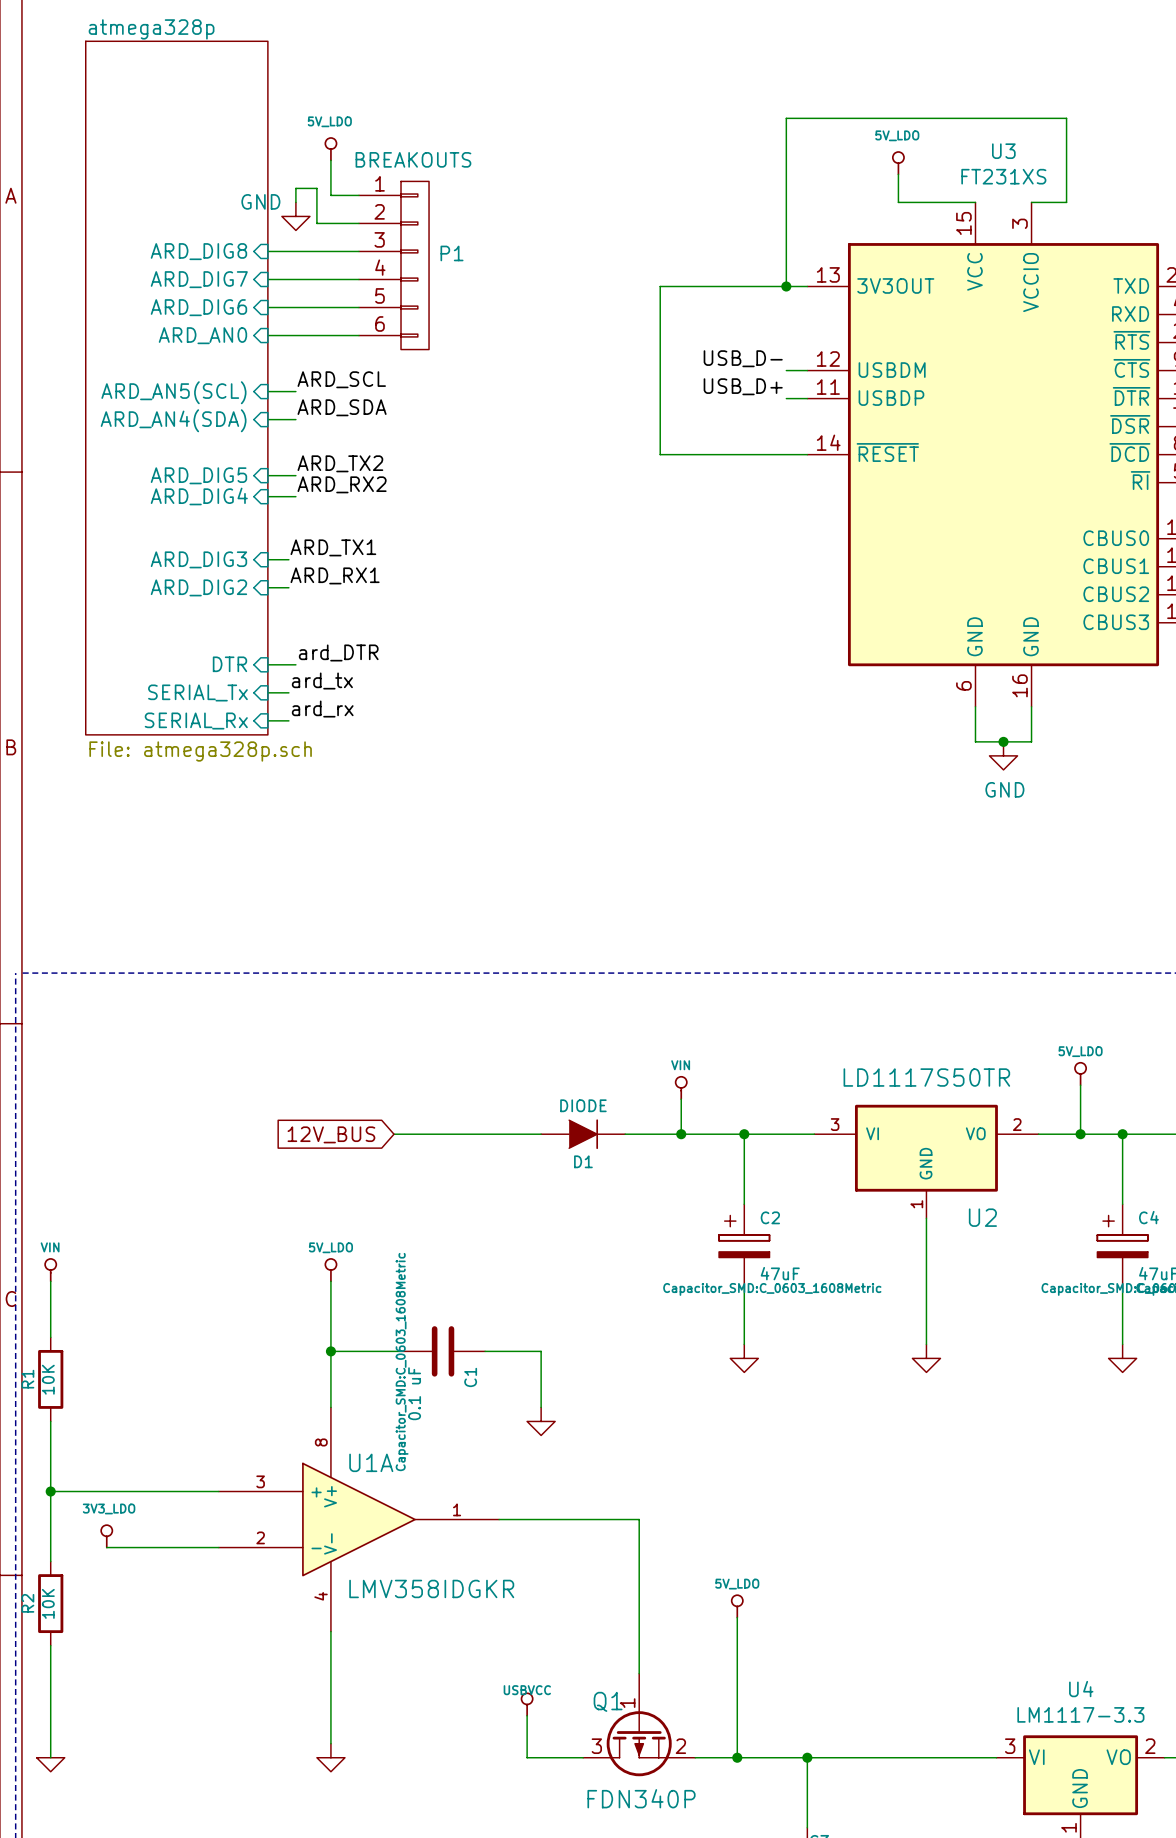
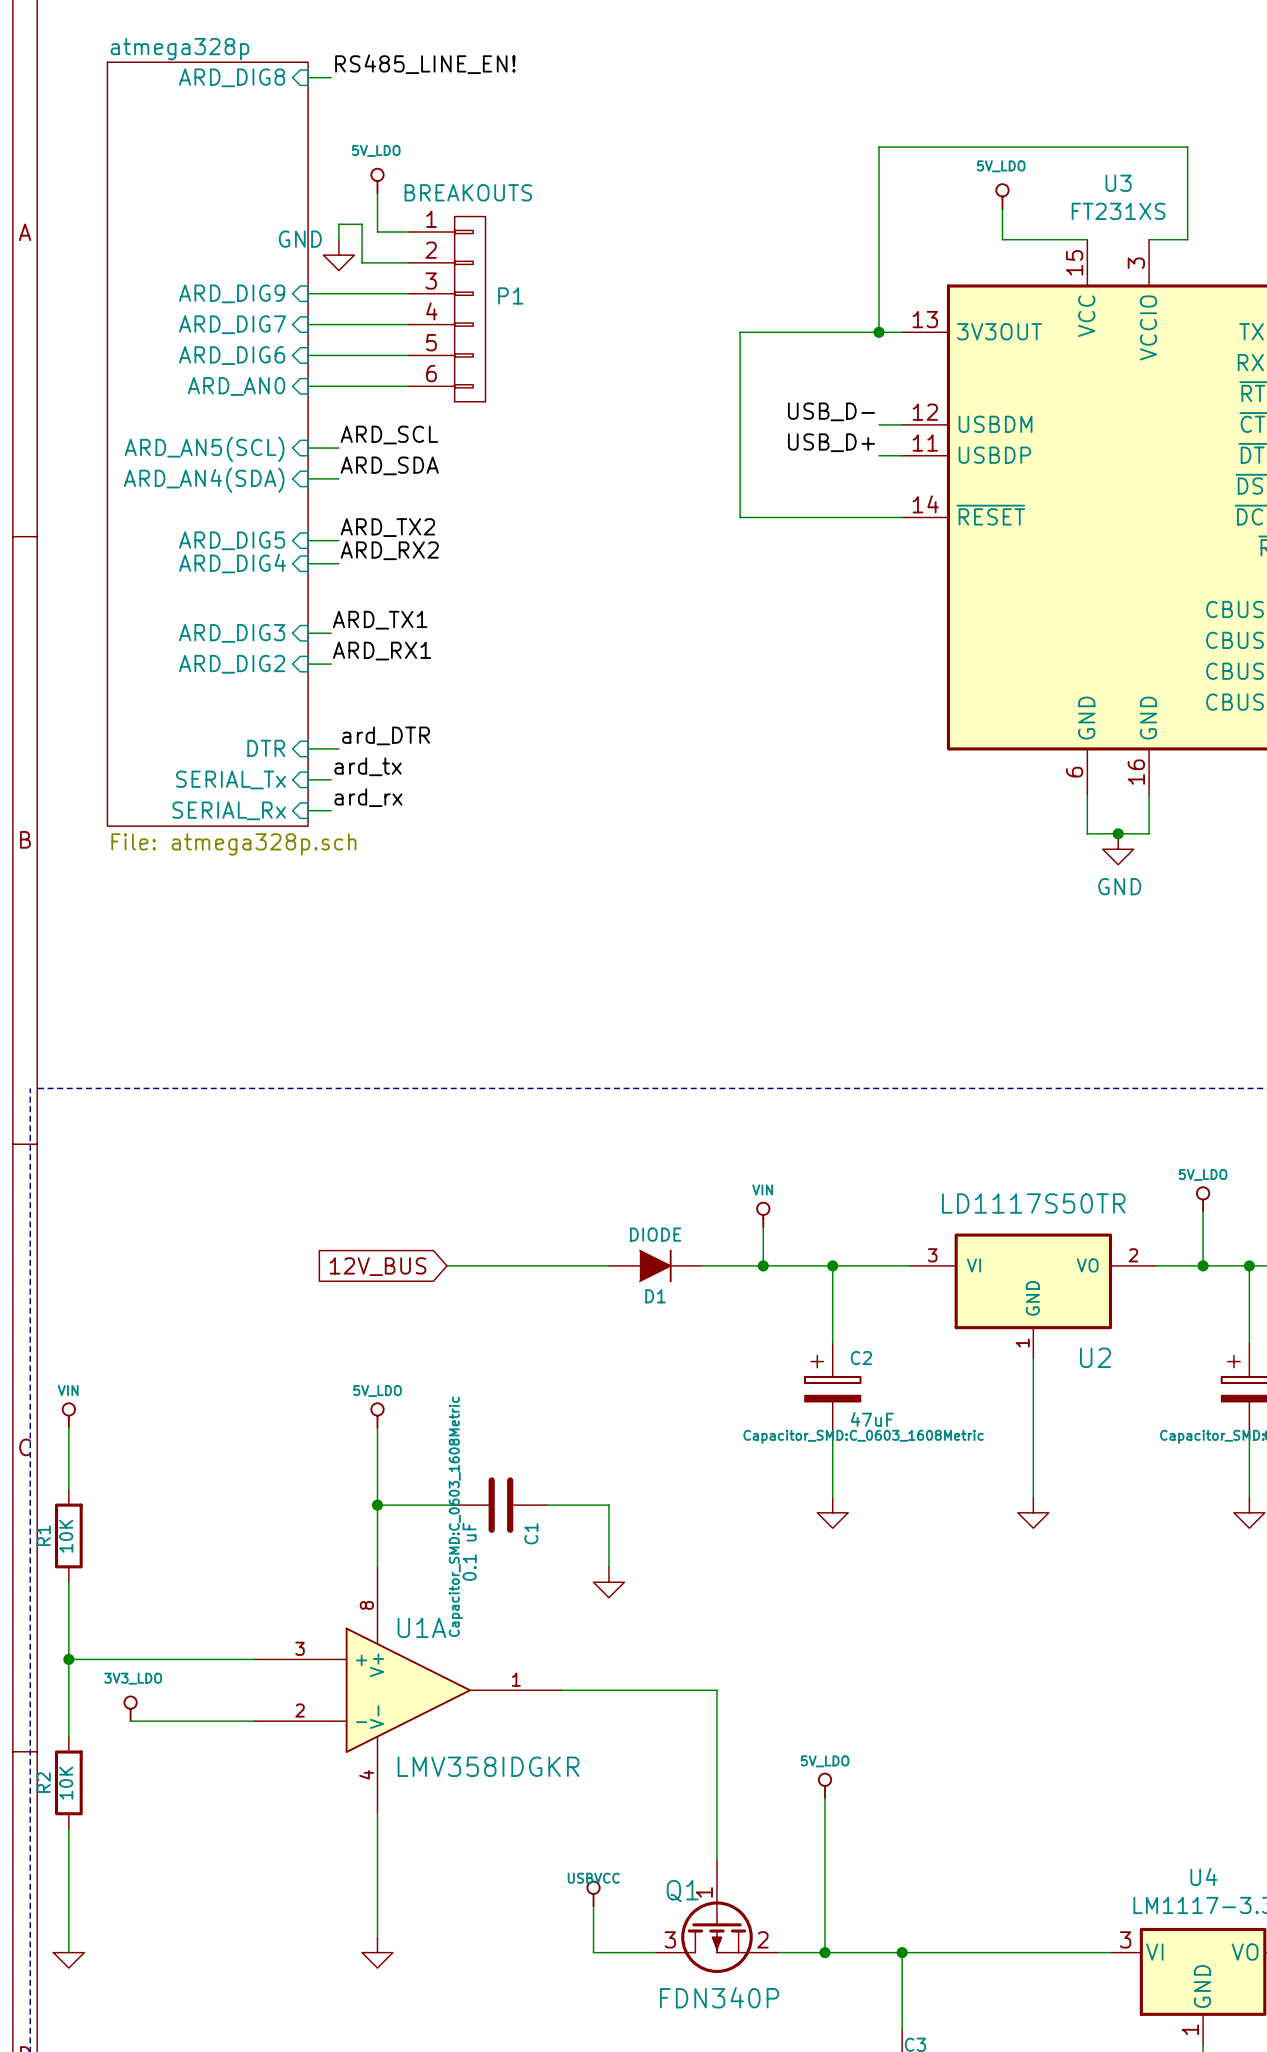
label: none -> RS485_LINE_EN! (425, 64)
sheet pin: none -> ARD_DIG8 (232, 77)
wire: none -> (308, 77) (331, 77)
sheet pin: ARD_DIG8 (198, 251) -> ARD_DIG9 (232, 293)

